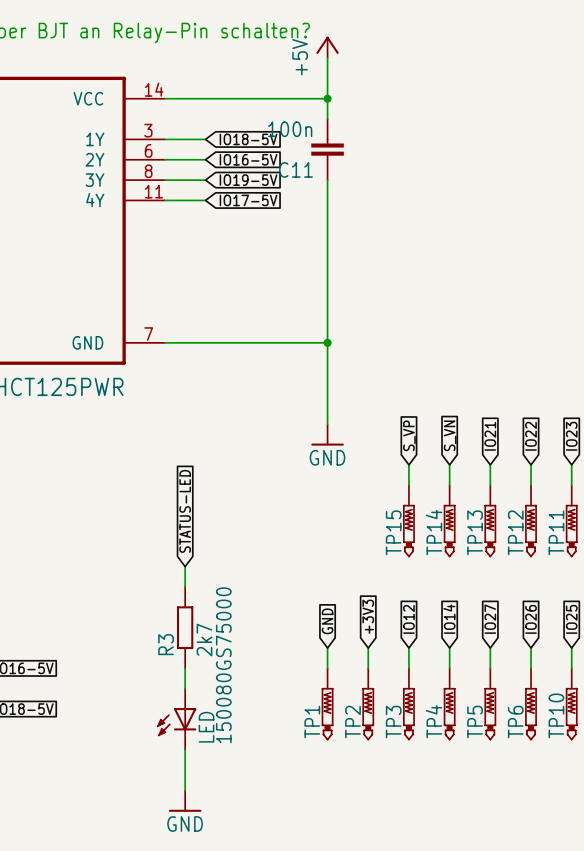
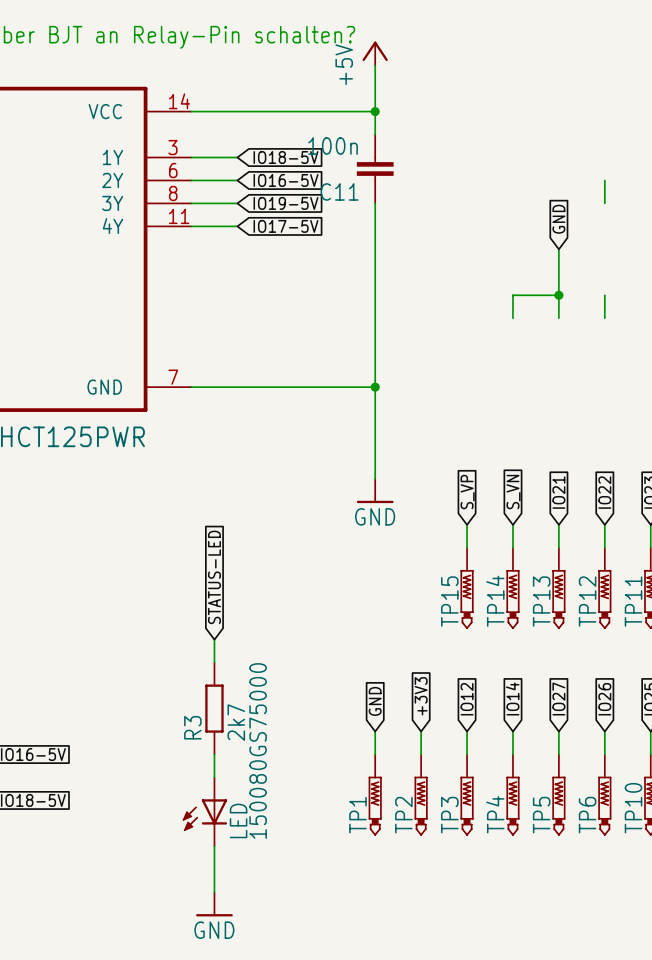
wire: none -> (604, 180) (604, 203)
global label: none -> GND (558, 219)
wire: none -> (558, 249) (558, 318)
wire: none -> (558, 295) (512, 295) (512, 318)
junction: none -> (558, 295)
wire: none -> (604, 295) (604, 318)

